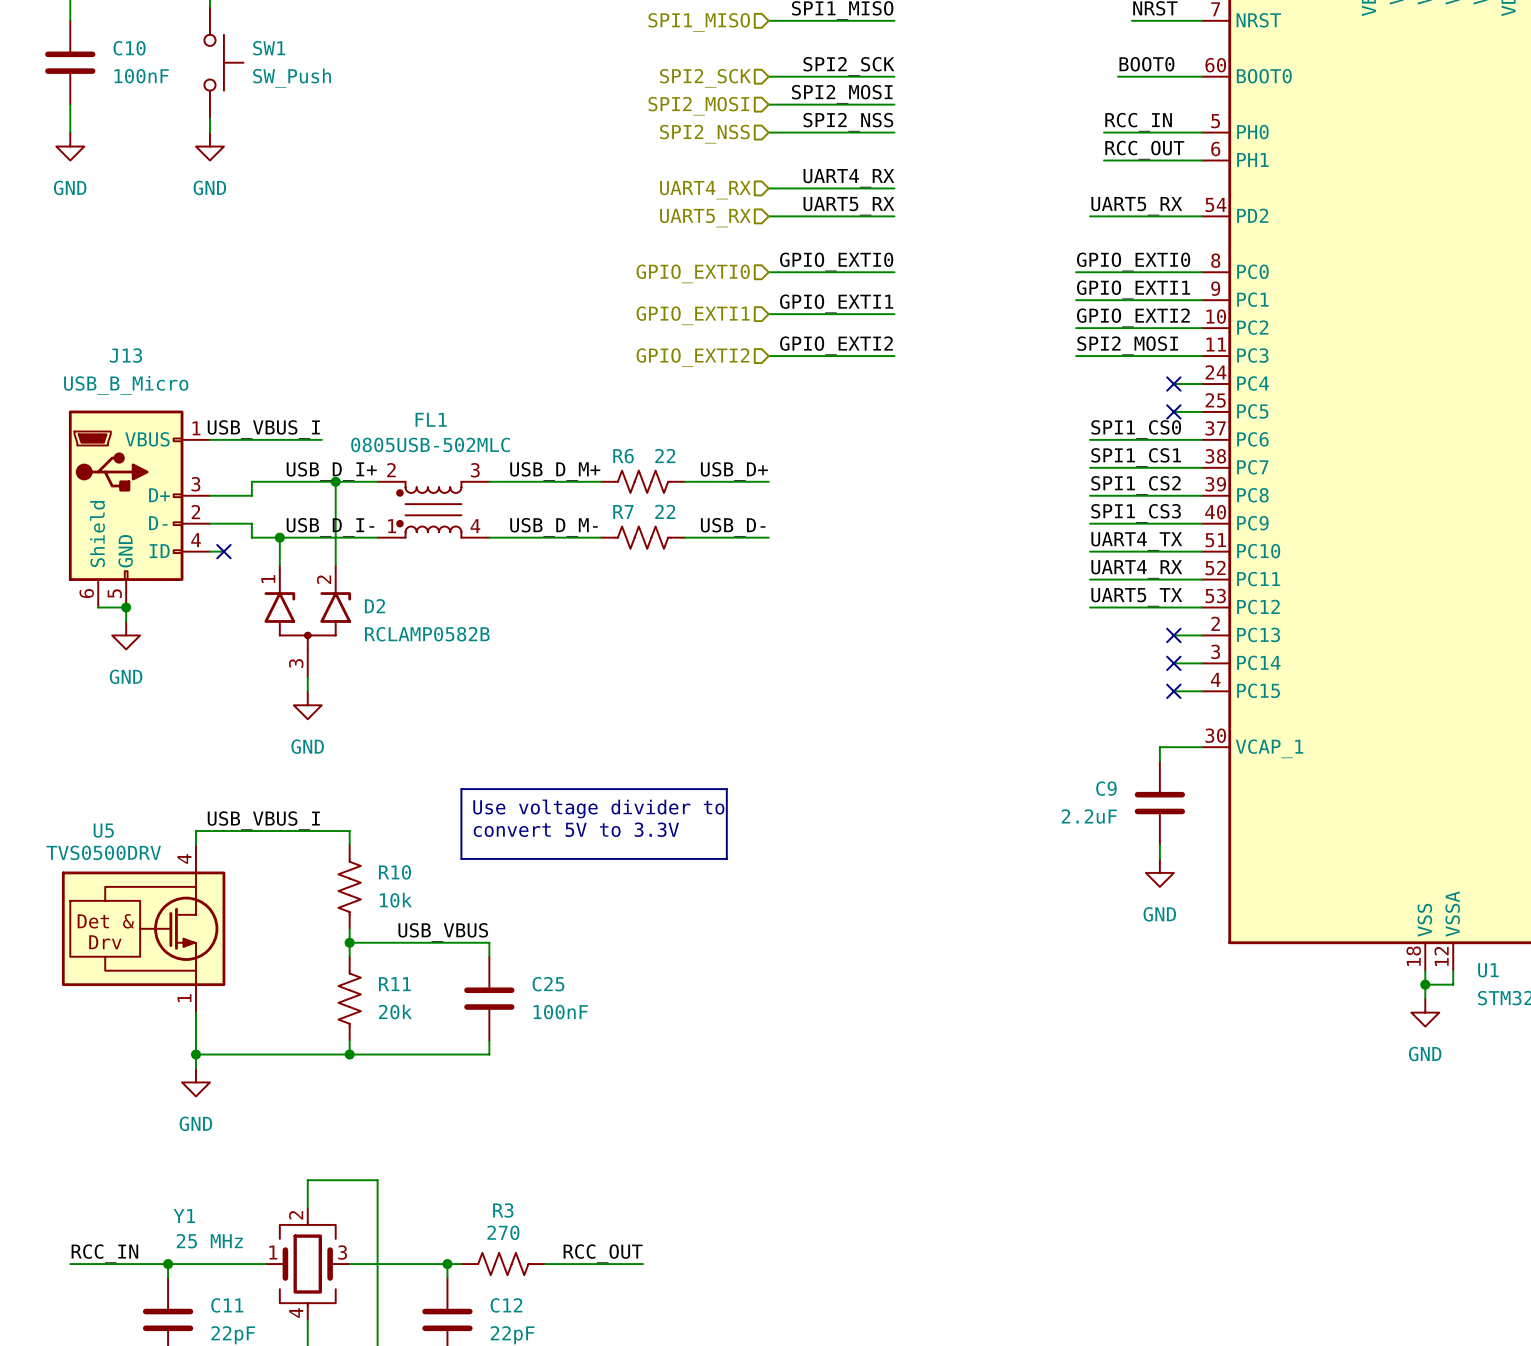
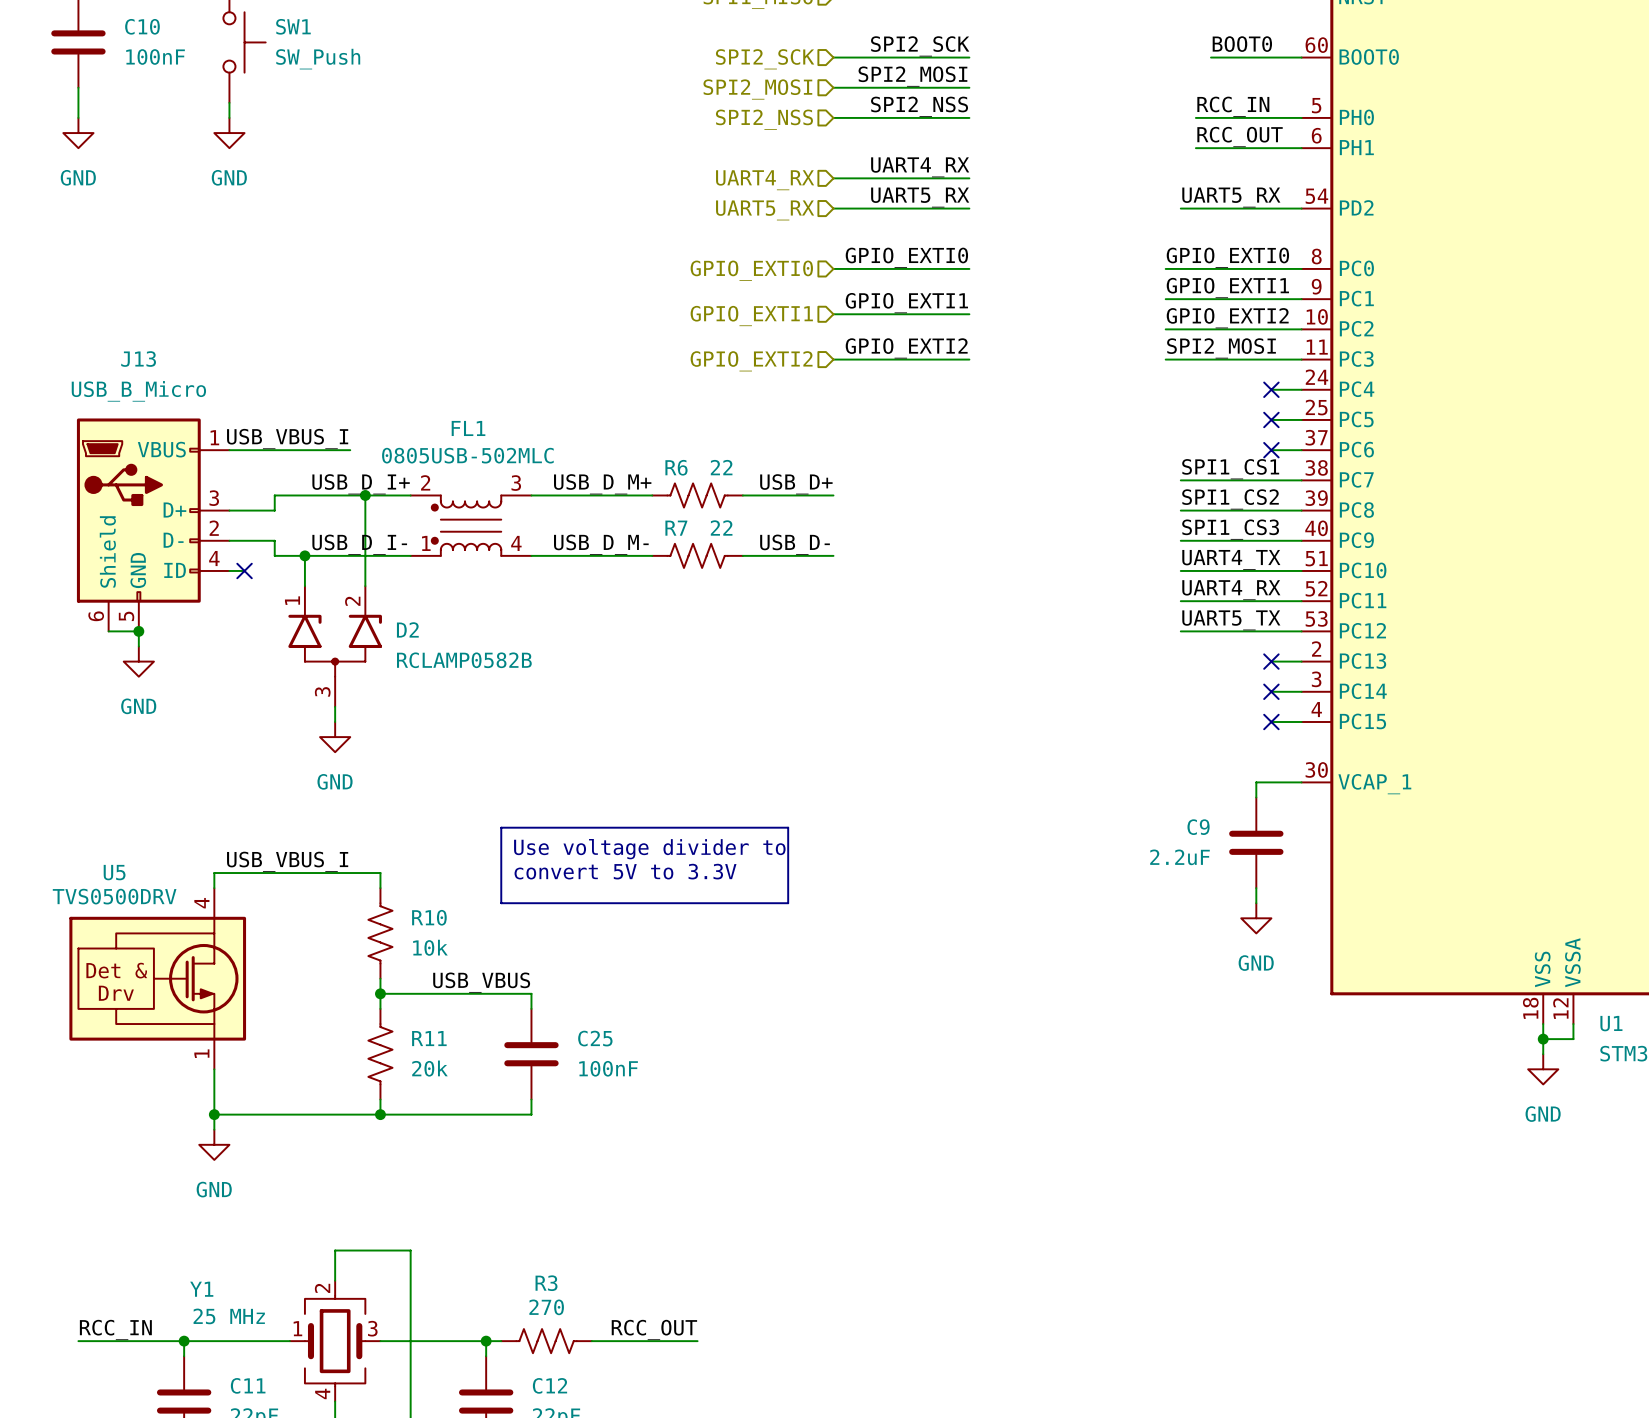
label: SPI1_CS0 (1136, 429) -> none
wire: (1090, 439) (1173, 439) -> none
no-connect mark: none -> (1271, 450)

